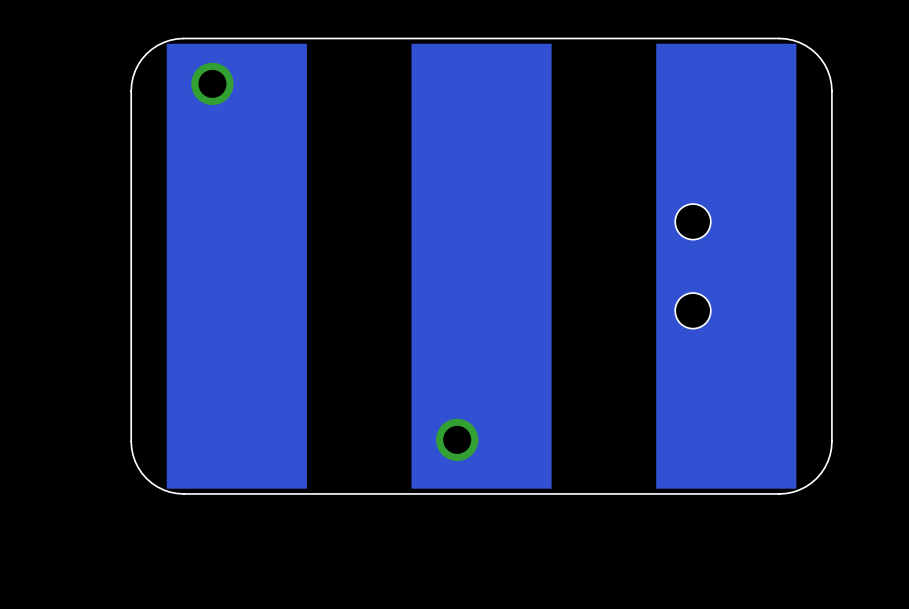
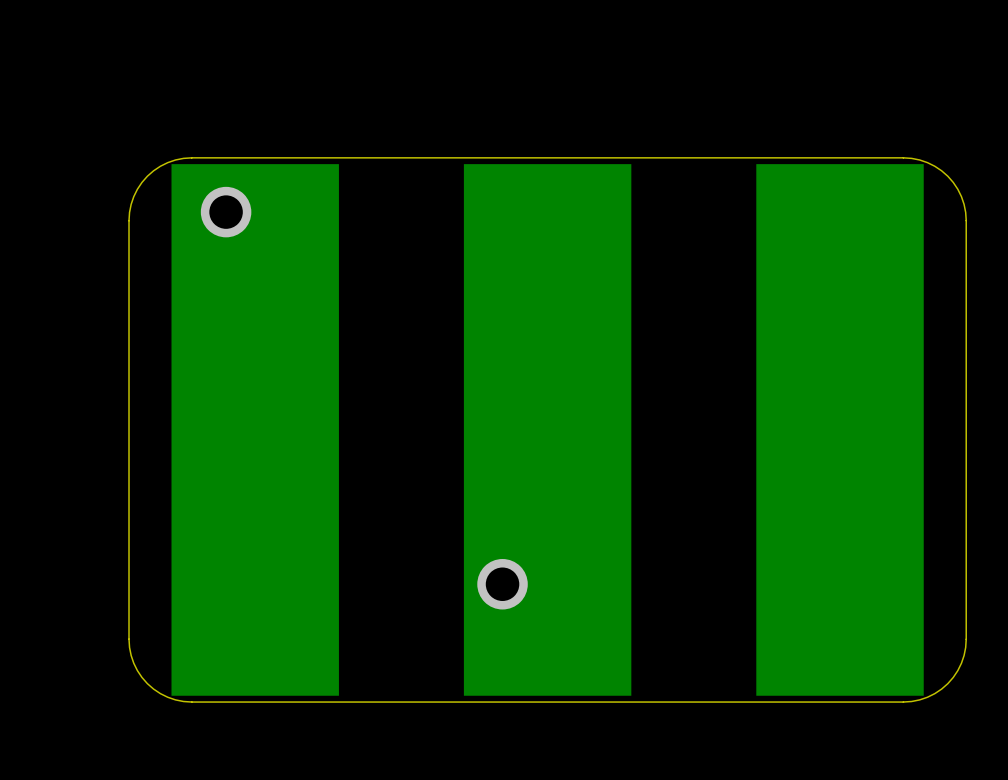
part: (693, 266) -> none
via position: (457, 439) -> (502, 584)

